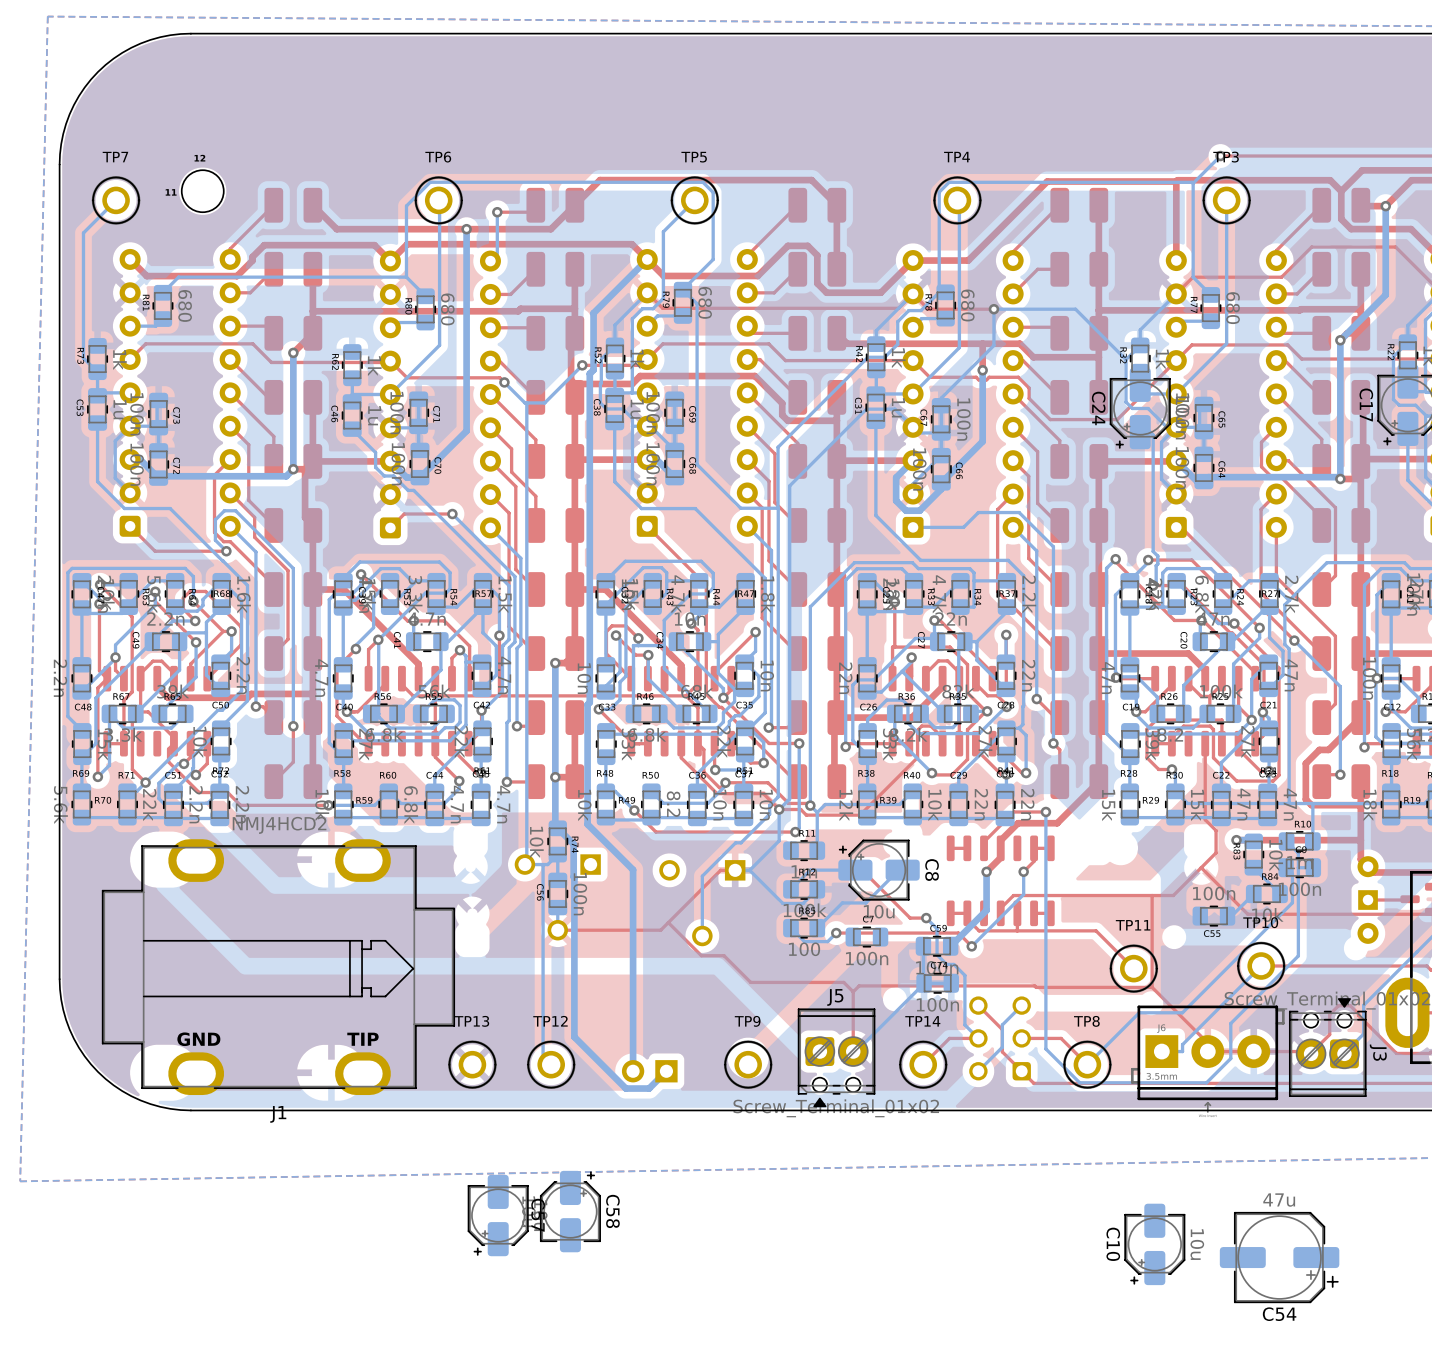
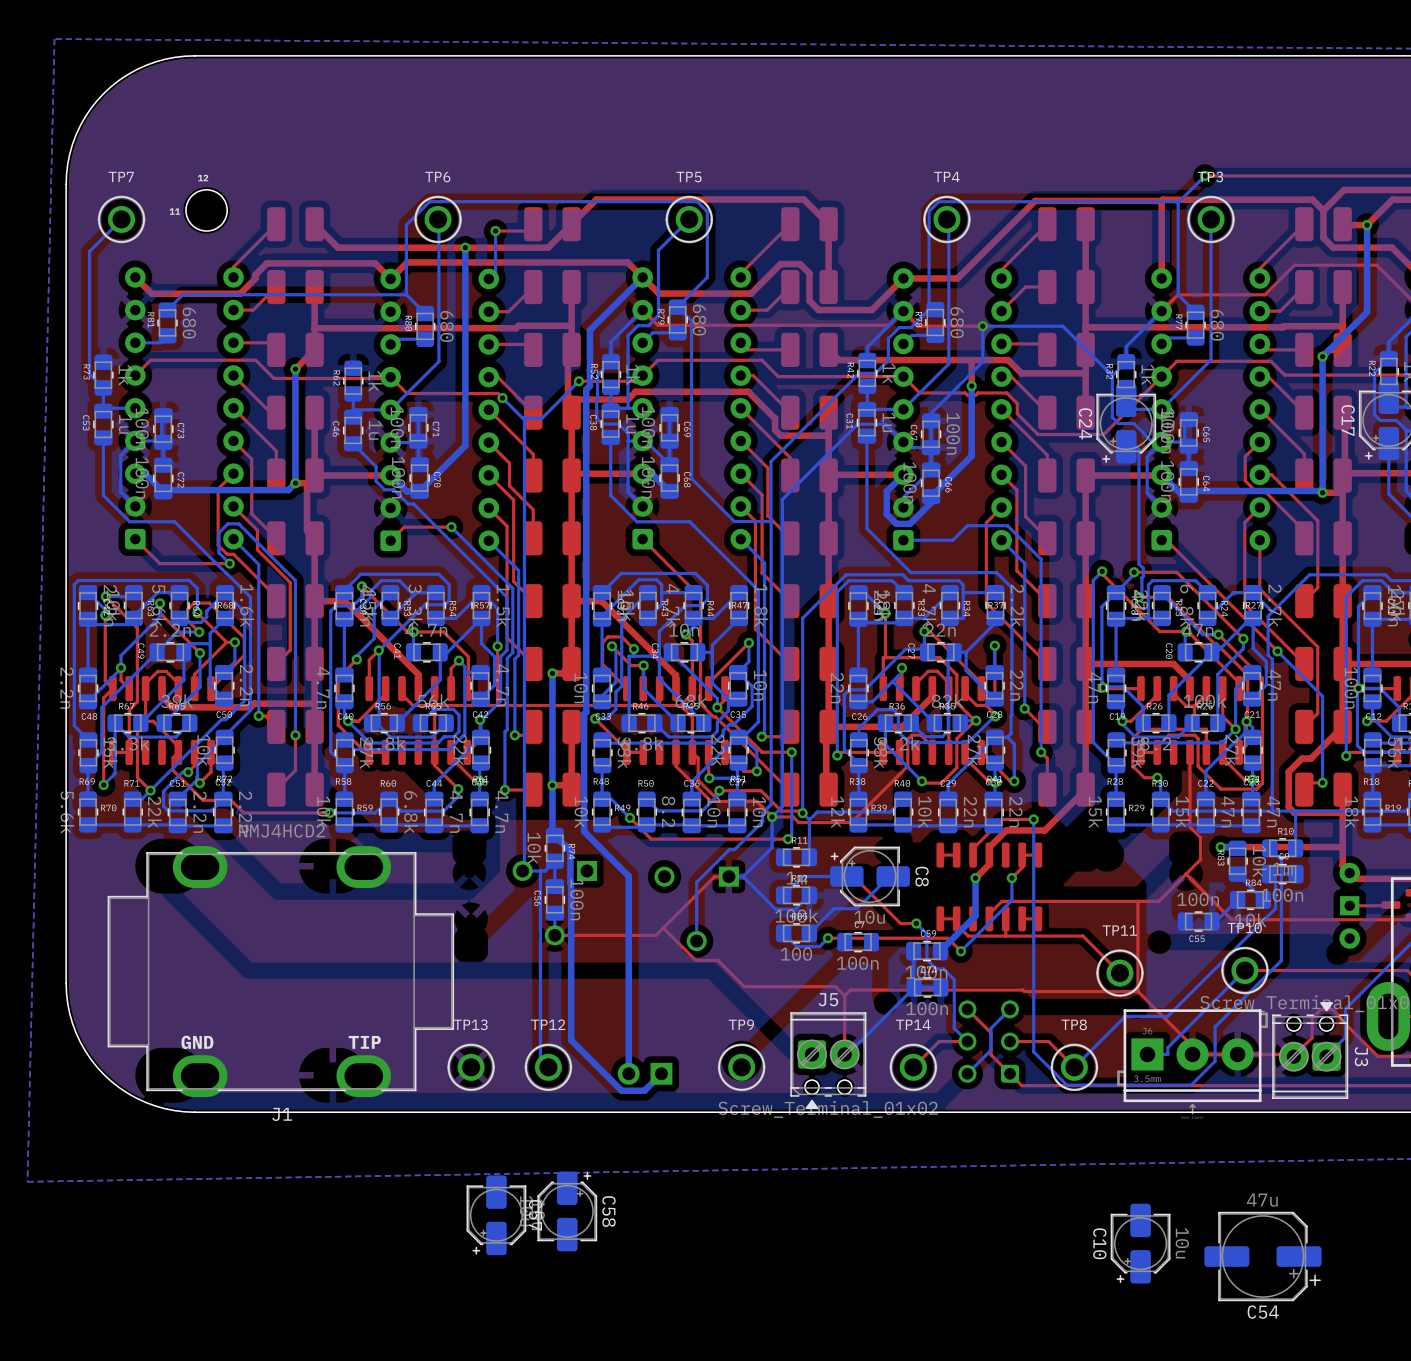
J1 footprint: [101, 839, 456, 1096] -> [107, 846, 455, 1098]

